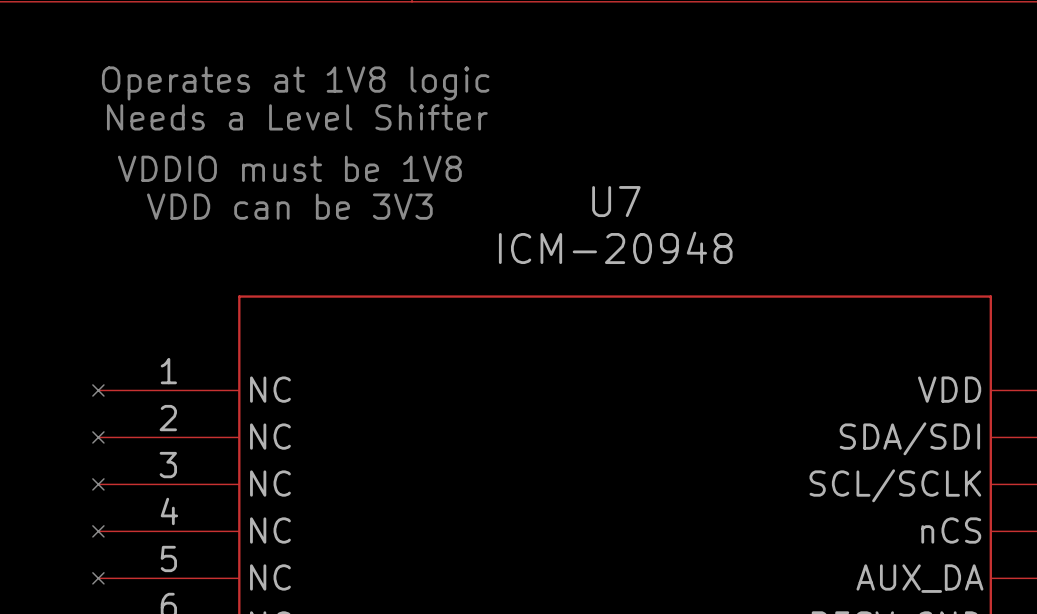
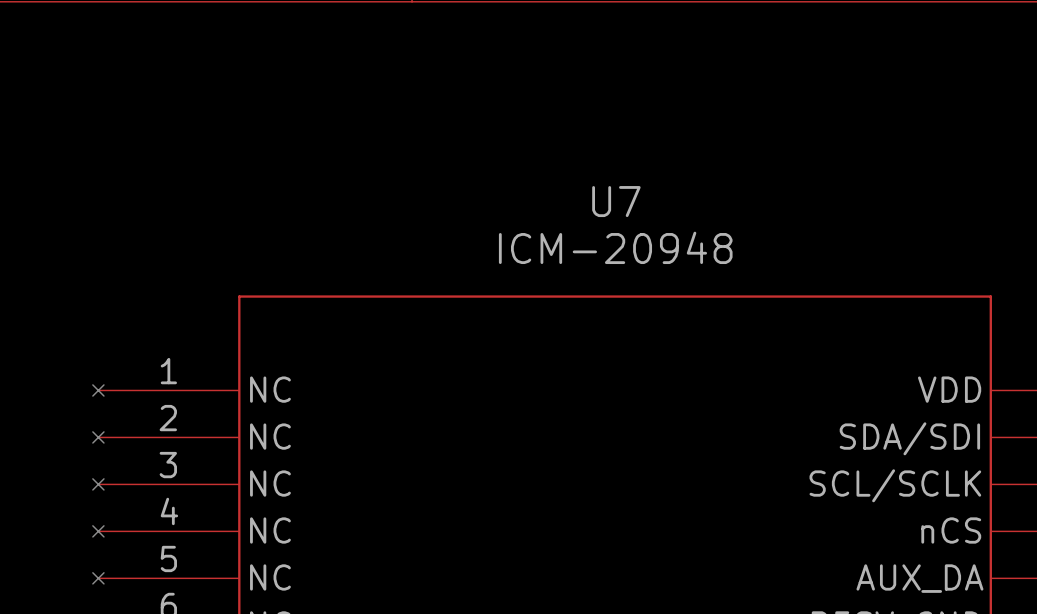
text: Operates at 1V8 logic (295, 83) -> none
text: Needs a Level Shifter (297, 117) -> none
text: VDDIO must be 1V8 (289, 168) -> none
text: VDD can be 3V3 (289, 206) -> none

